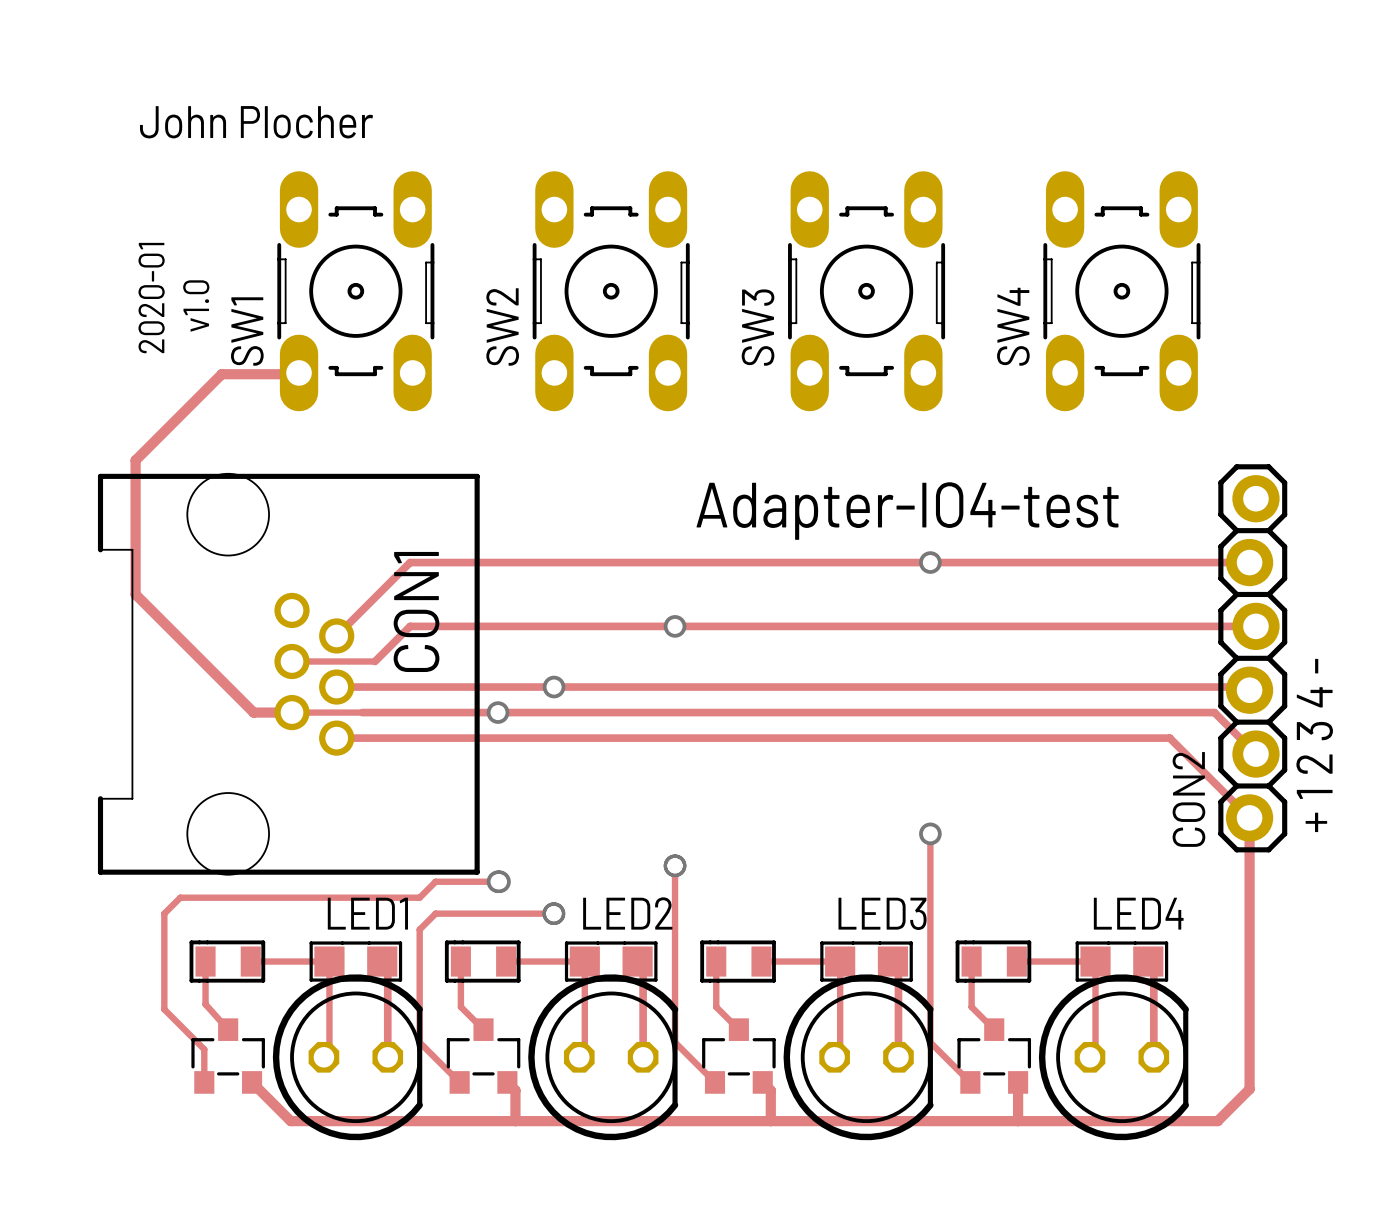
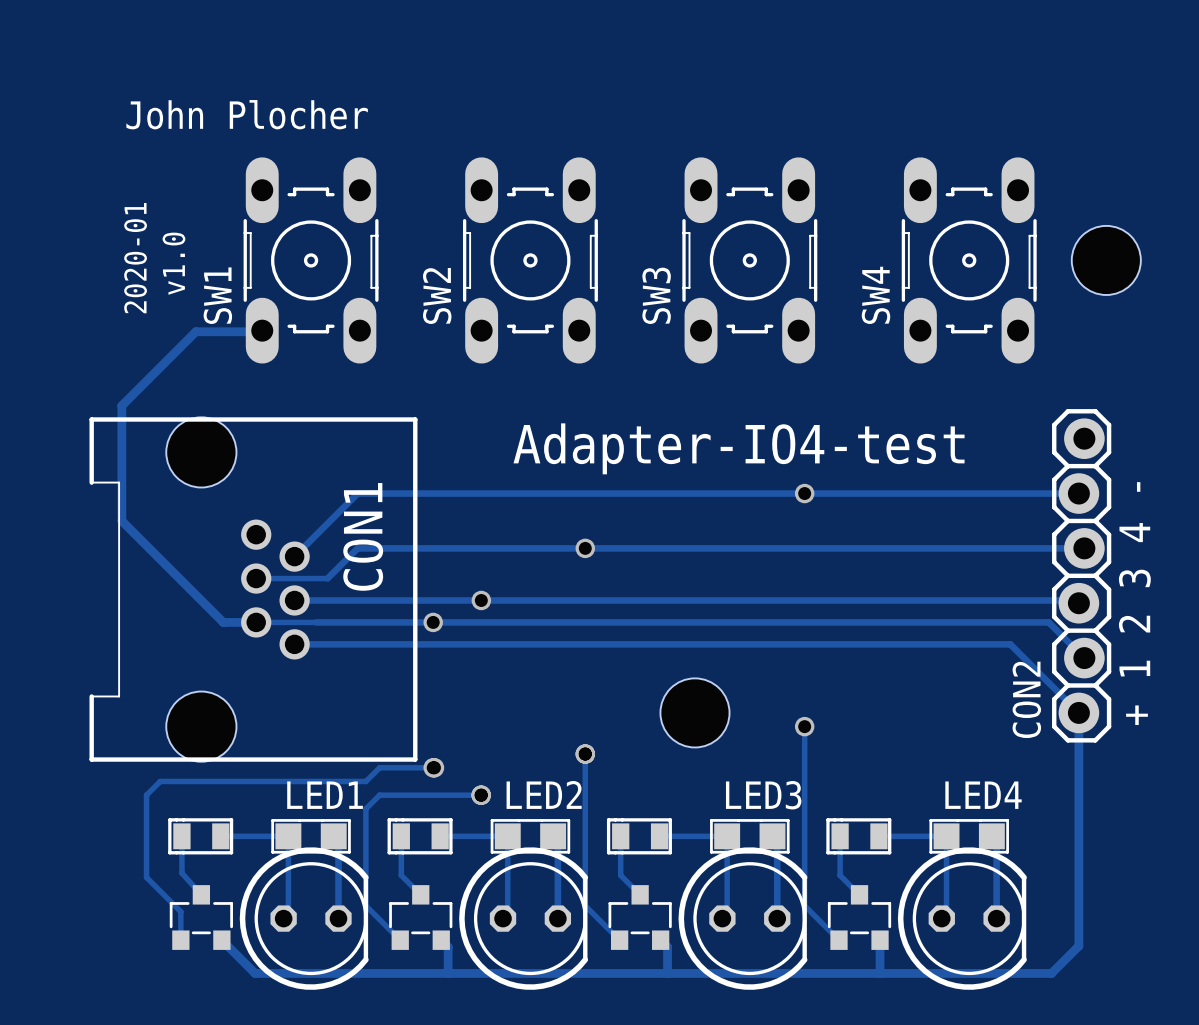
hole: none -> (1106, 260)
hole: none -> (694, 712)

